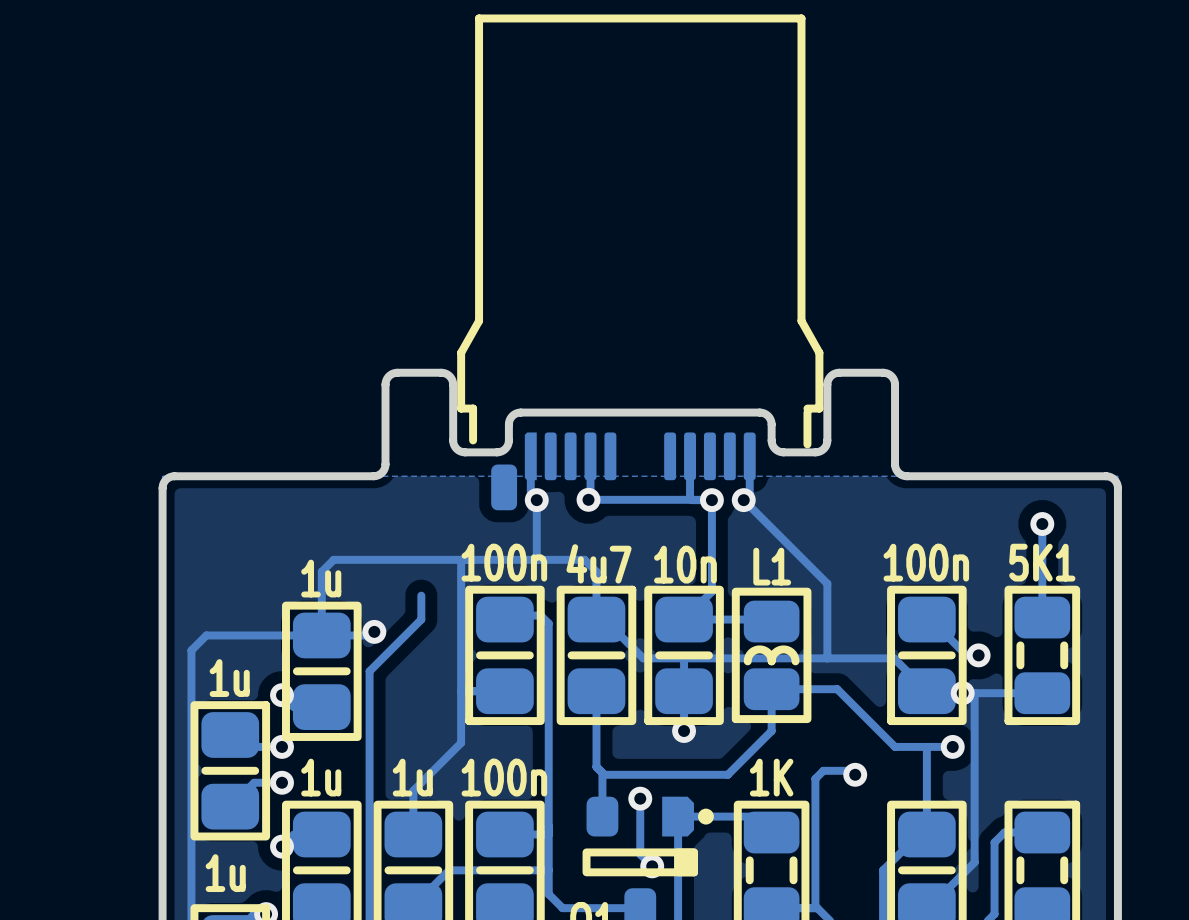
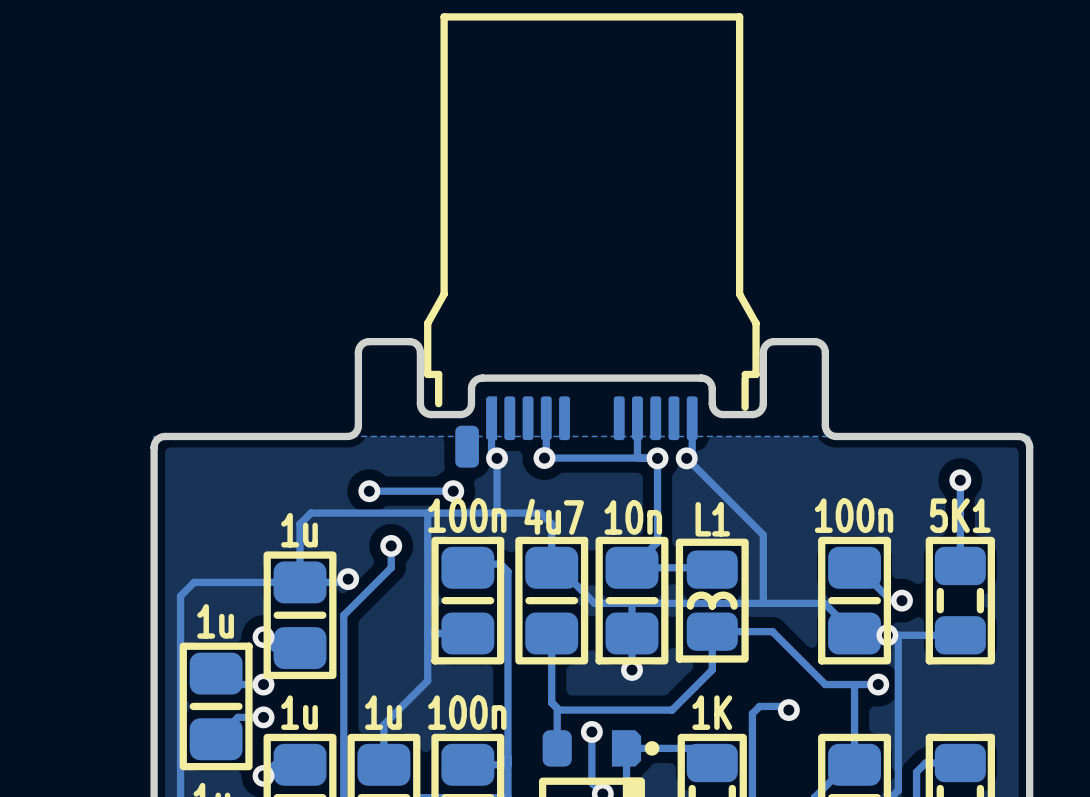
via: none -> (369, 491)
track: none -> (453, 491) (369, 491)
via: none -> (453, 491)
via: none -> (391, 545)

